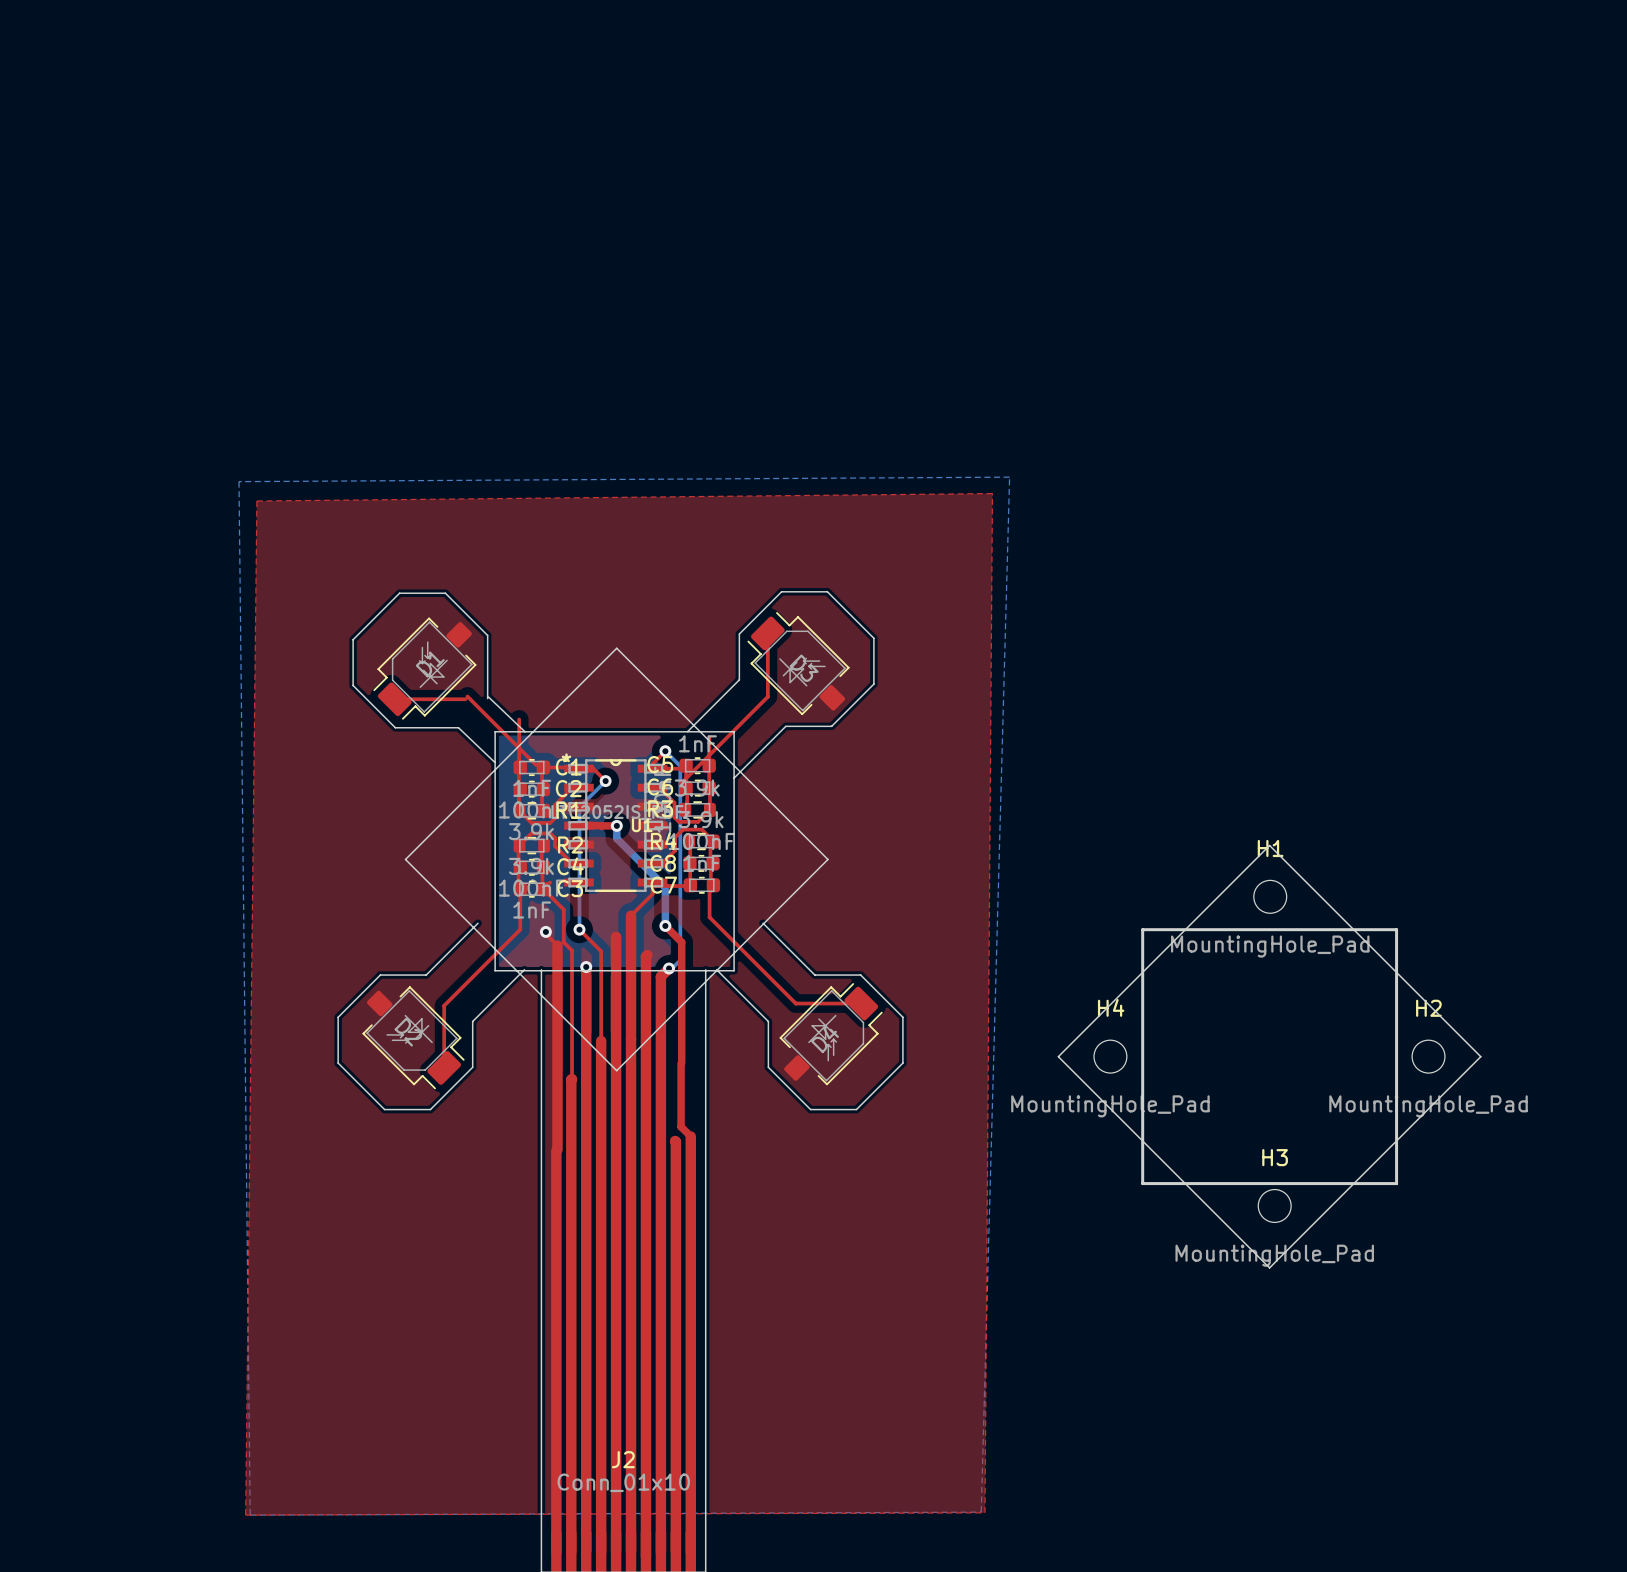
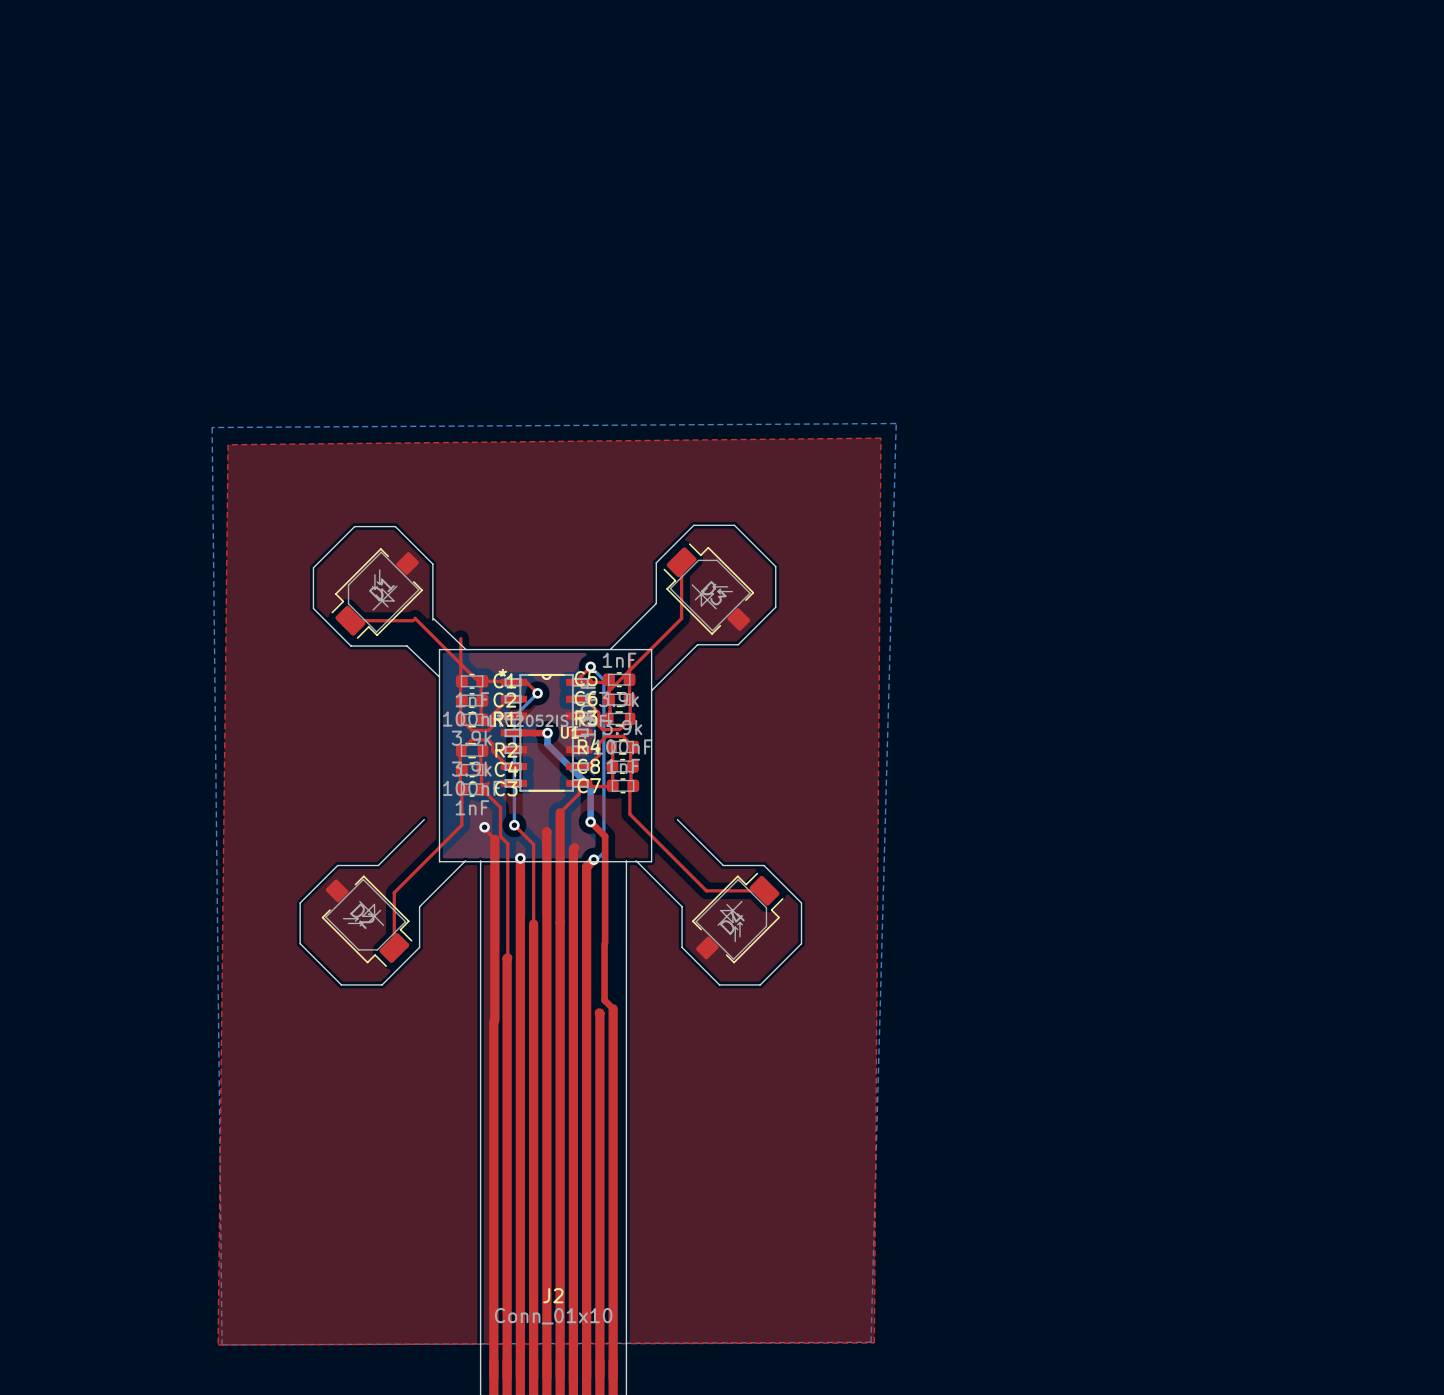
board edge: (616, 648) (405, 859) (616, 1070) (827, 859) (616, 648) -> none
board edge: (1269, 845) (1058, 1056) (1269, 1267) (1480, 1056) (1269, 845) -> none
H1: MountingHole_Pad (1270, 896) -> none
board edge: (1142, 929) (1396, 929) (1396, 1183) (1142, 1183) (1142, 929) -> none
H4: MountingHole_Pad (1110, 1056) -> none
H2: MountingHole_Pad (1428, 1056) -> none
H3: MountingHole_Pad (1274, 1205) -> none

